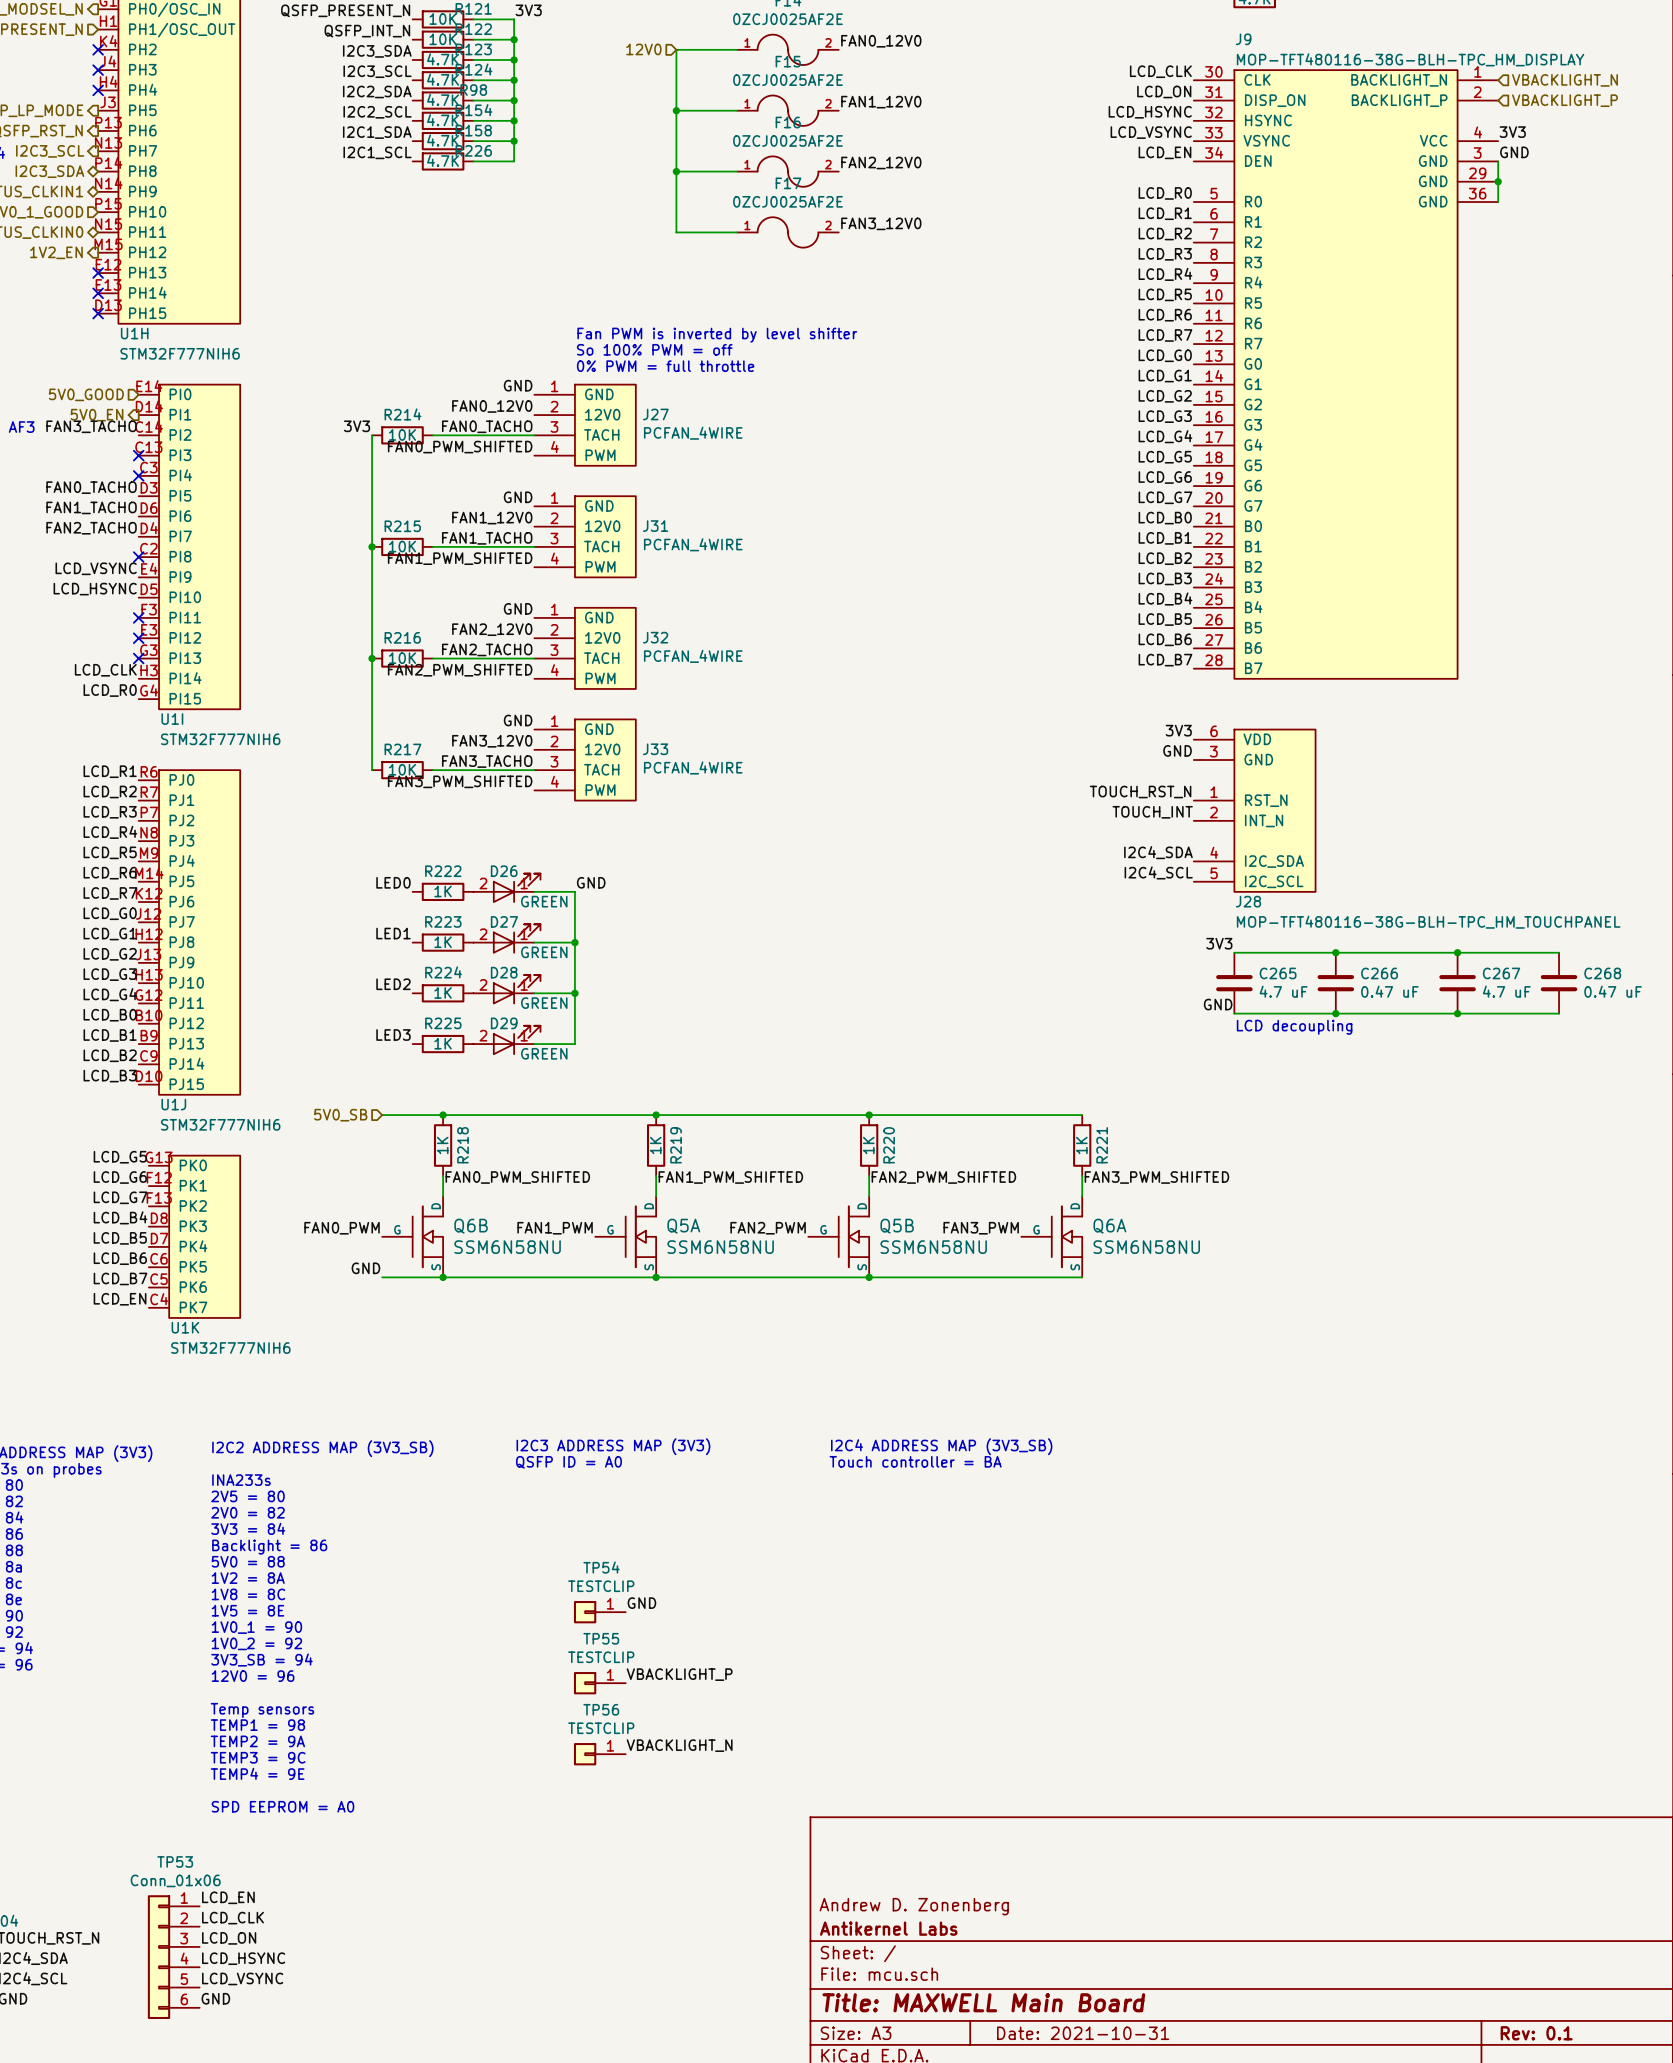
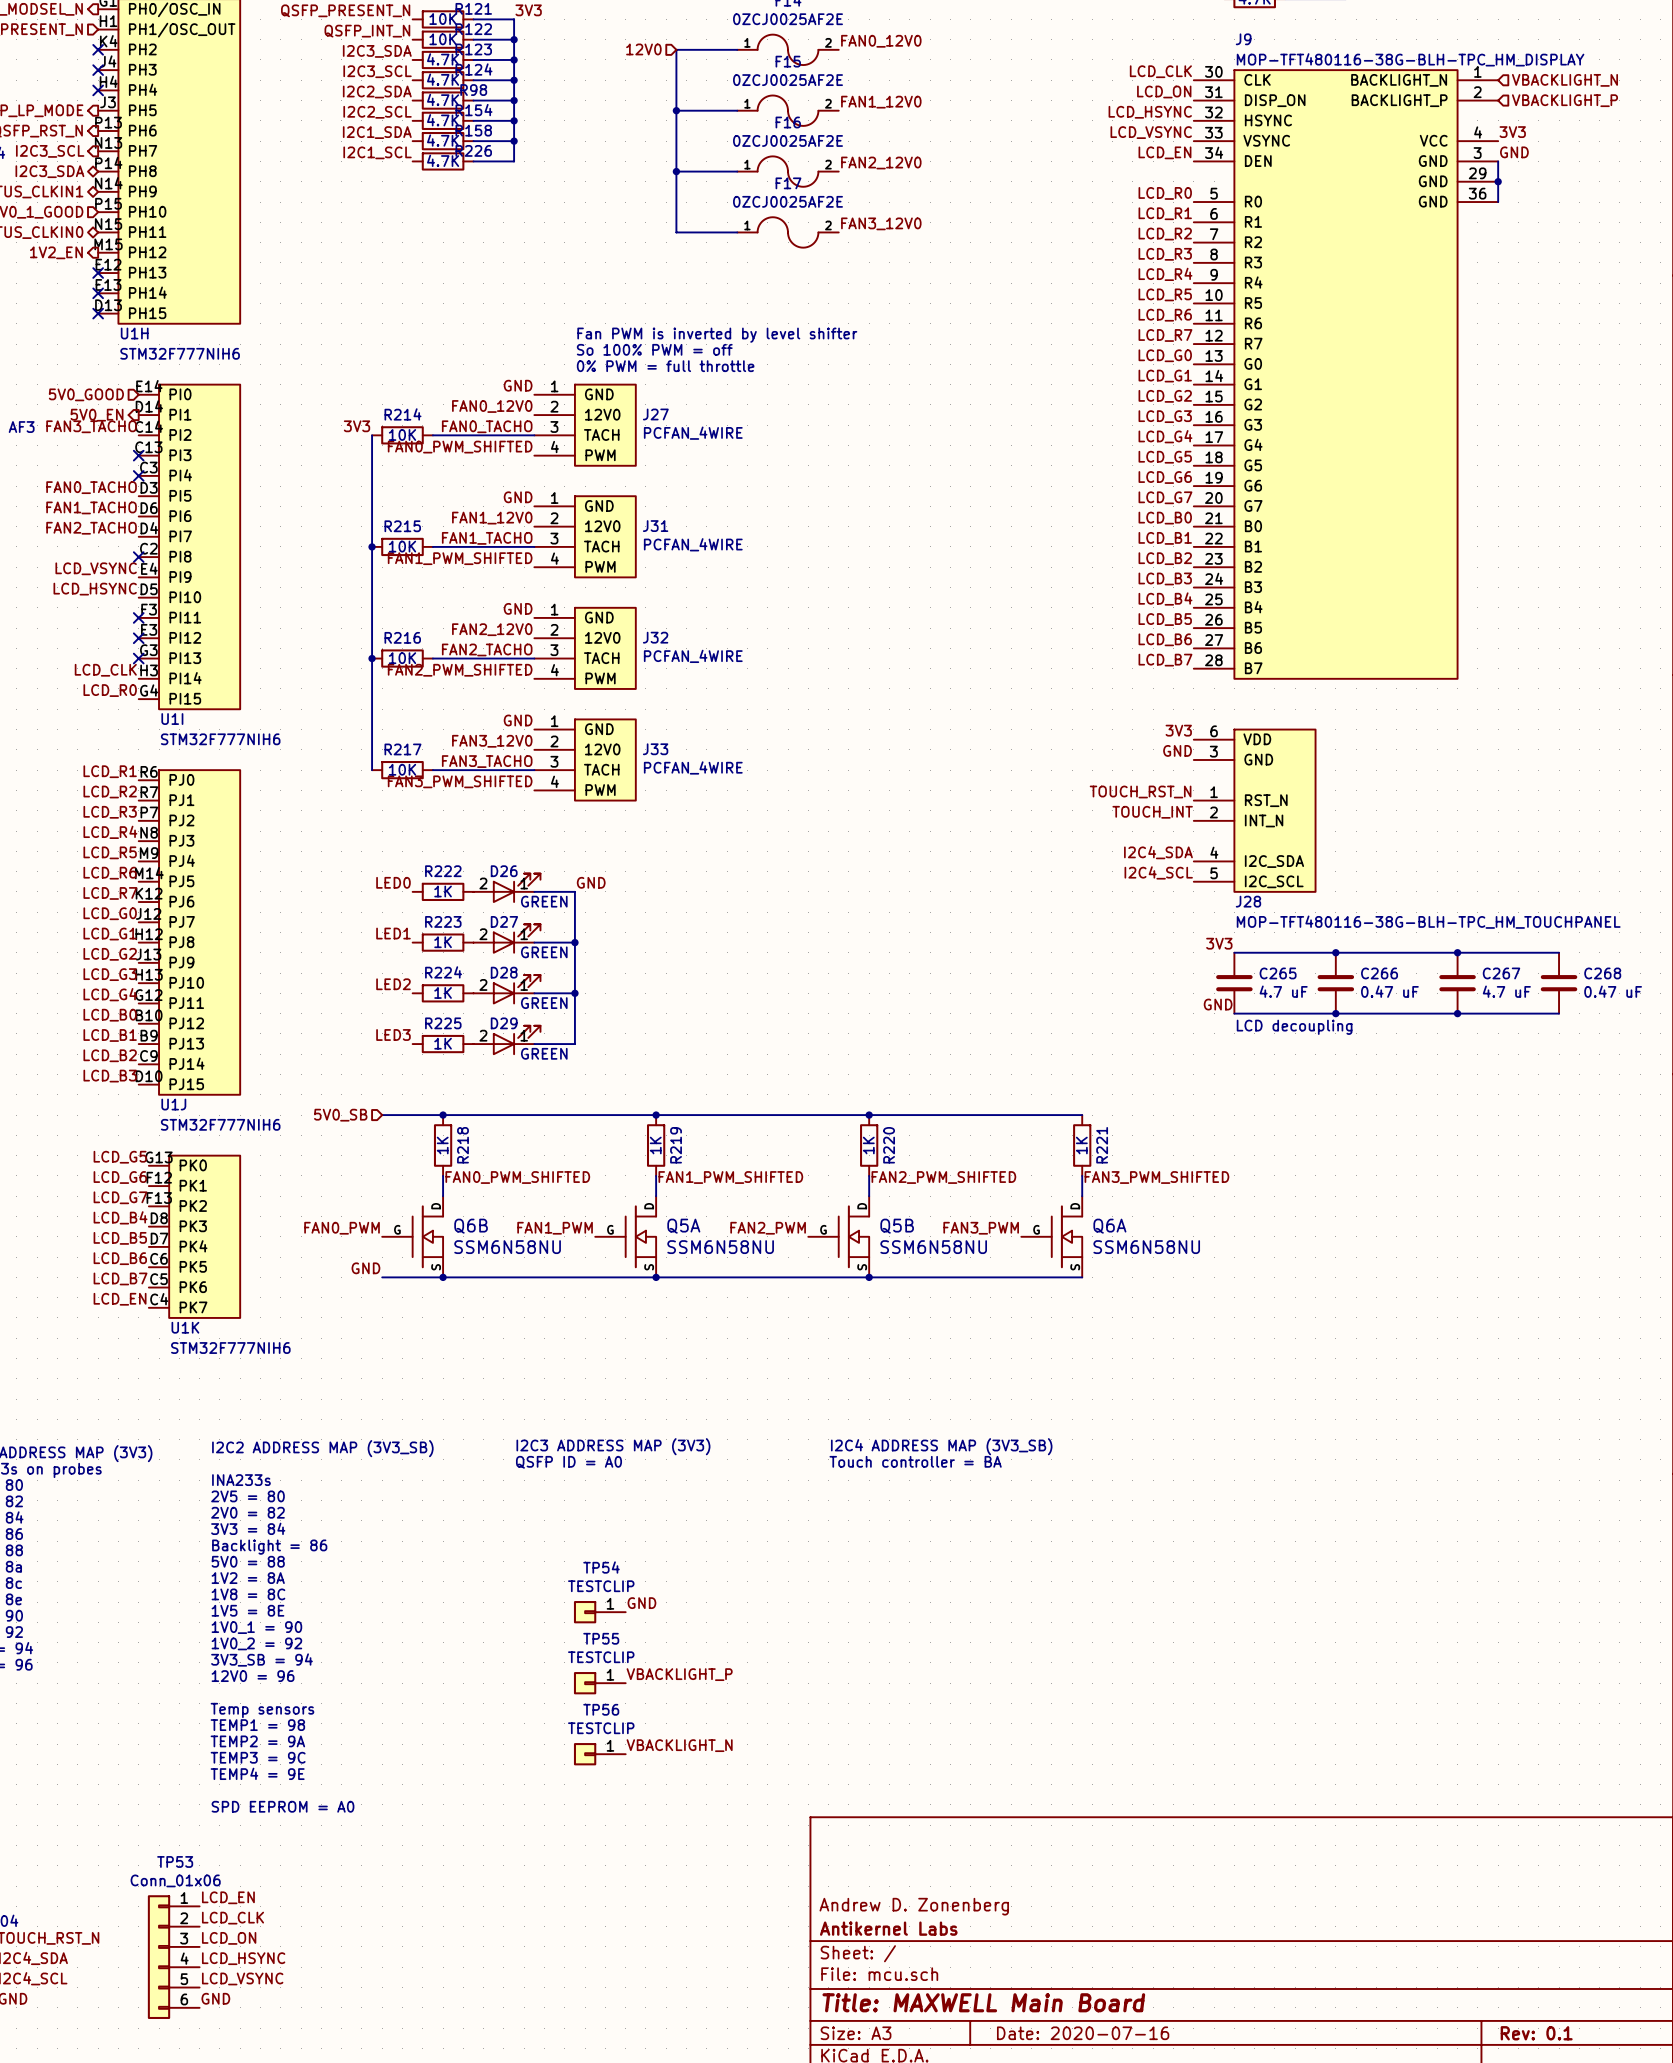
title block: Date: 2021-10-31 (1083, 2033) -> Date: 2020-07-16 (1083, 2033)

